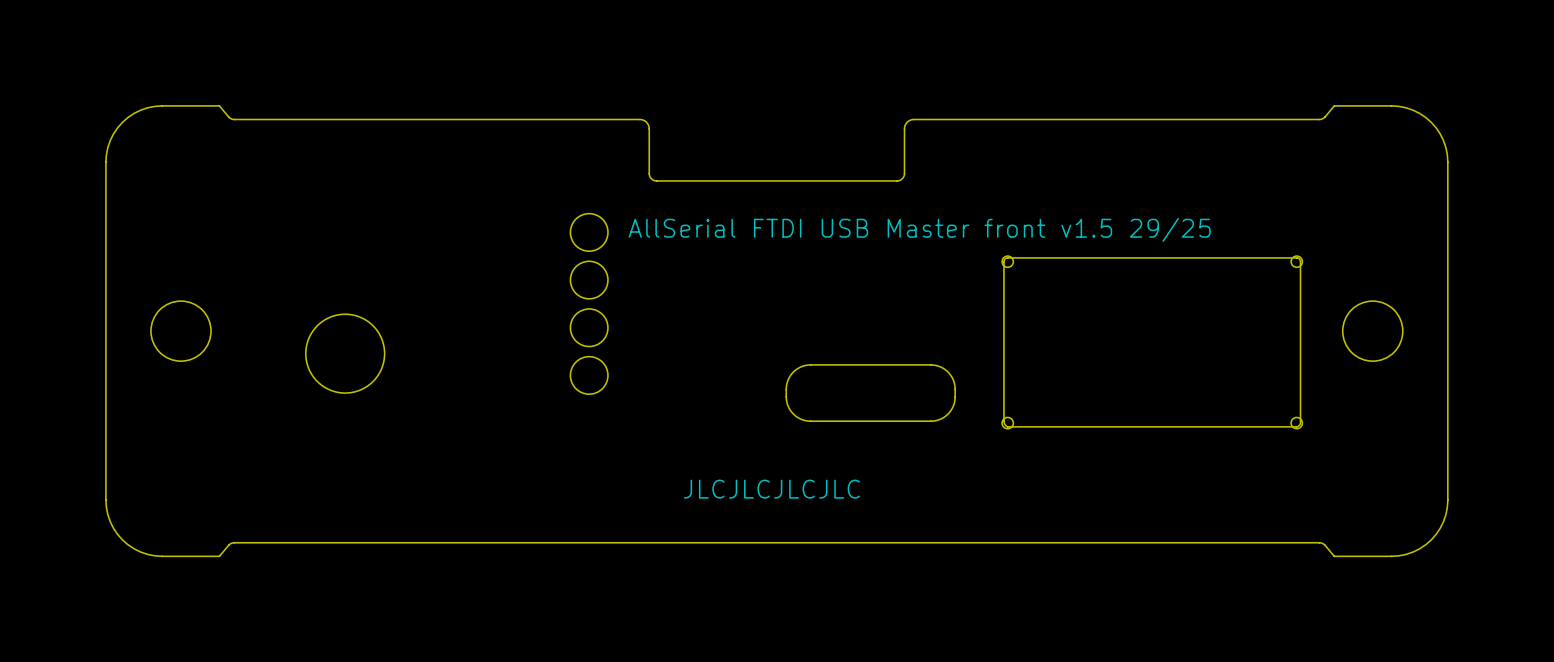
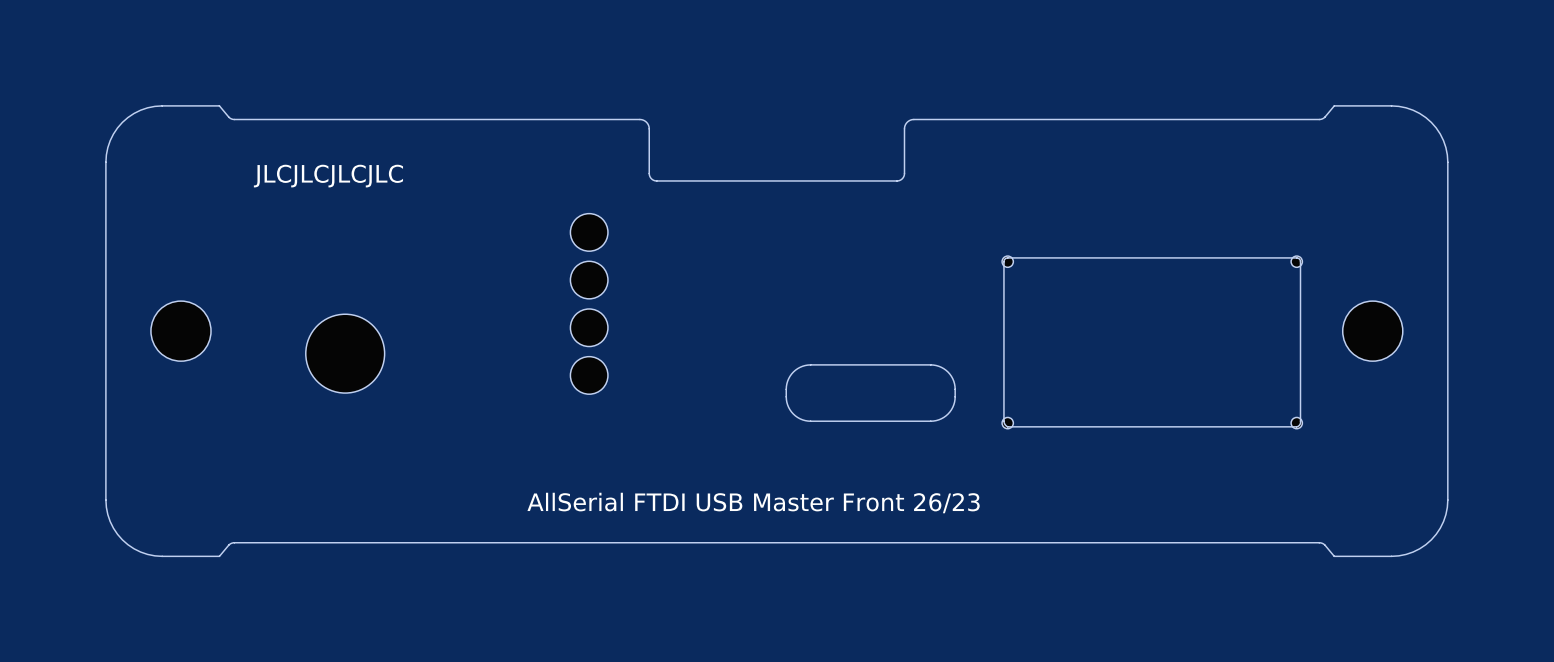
text: none -> JLCJLCJLCJLC (328, 176)
text: AllSerial FTDI USB Master front v1.5 29/25 (919, 229) -> none
text: JLCJLCJLCJLC (771, 489) -> none
text: none -> AllSerial FTDI USB Master Front 26/23 (753, 503)

